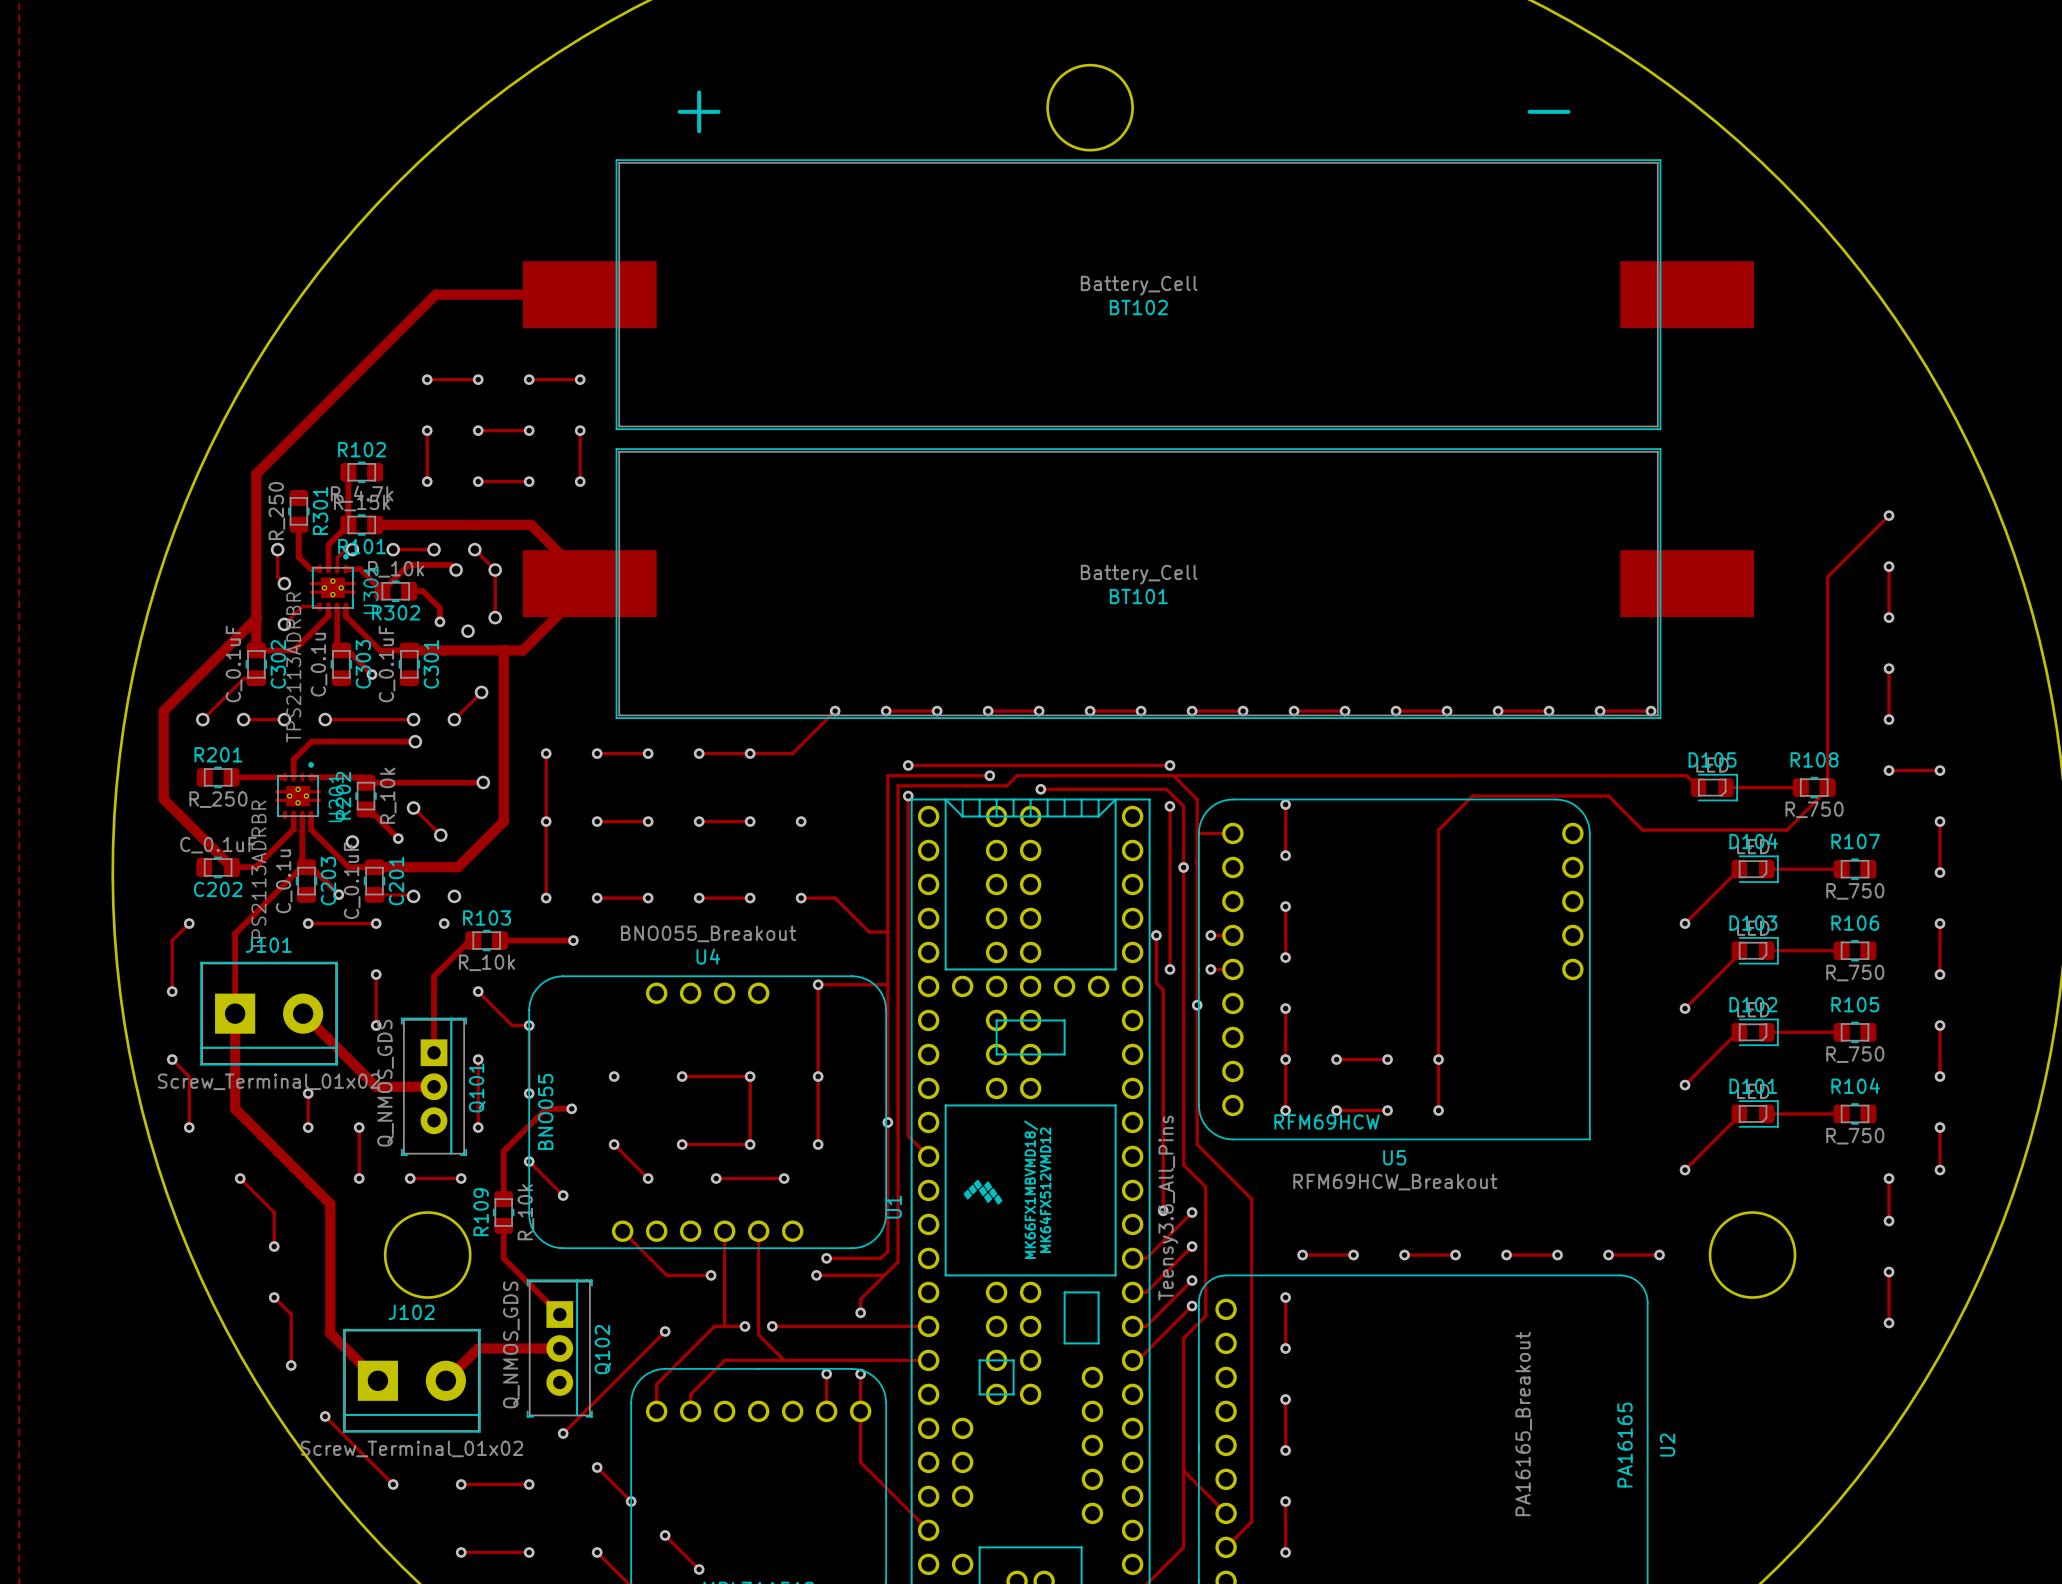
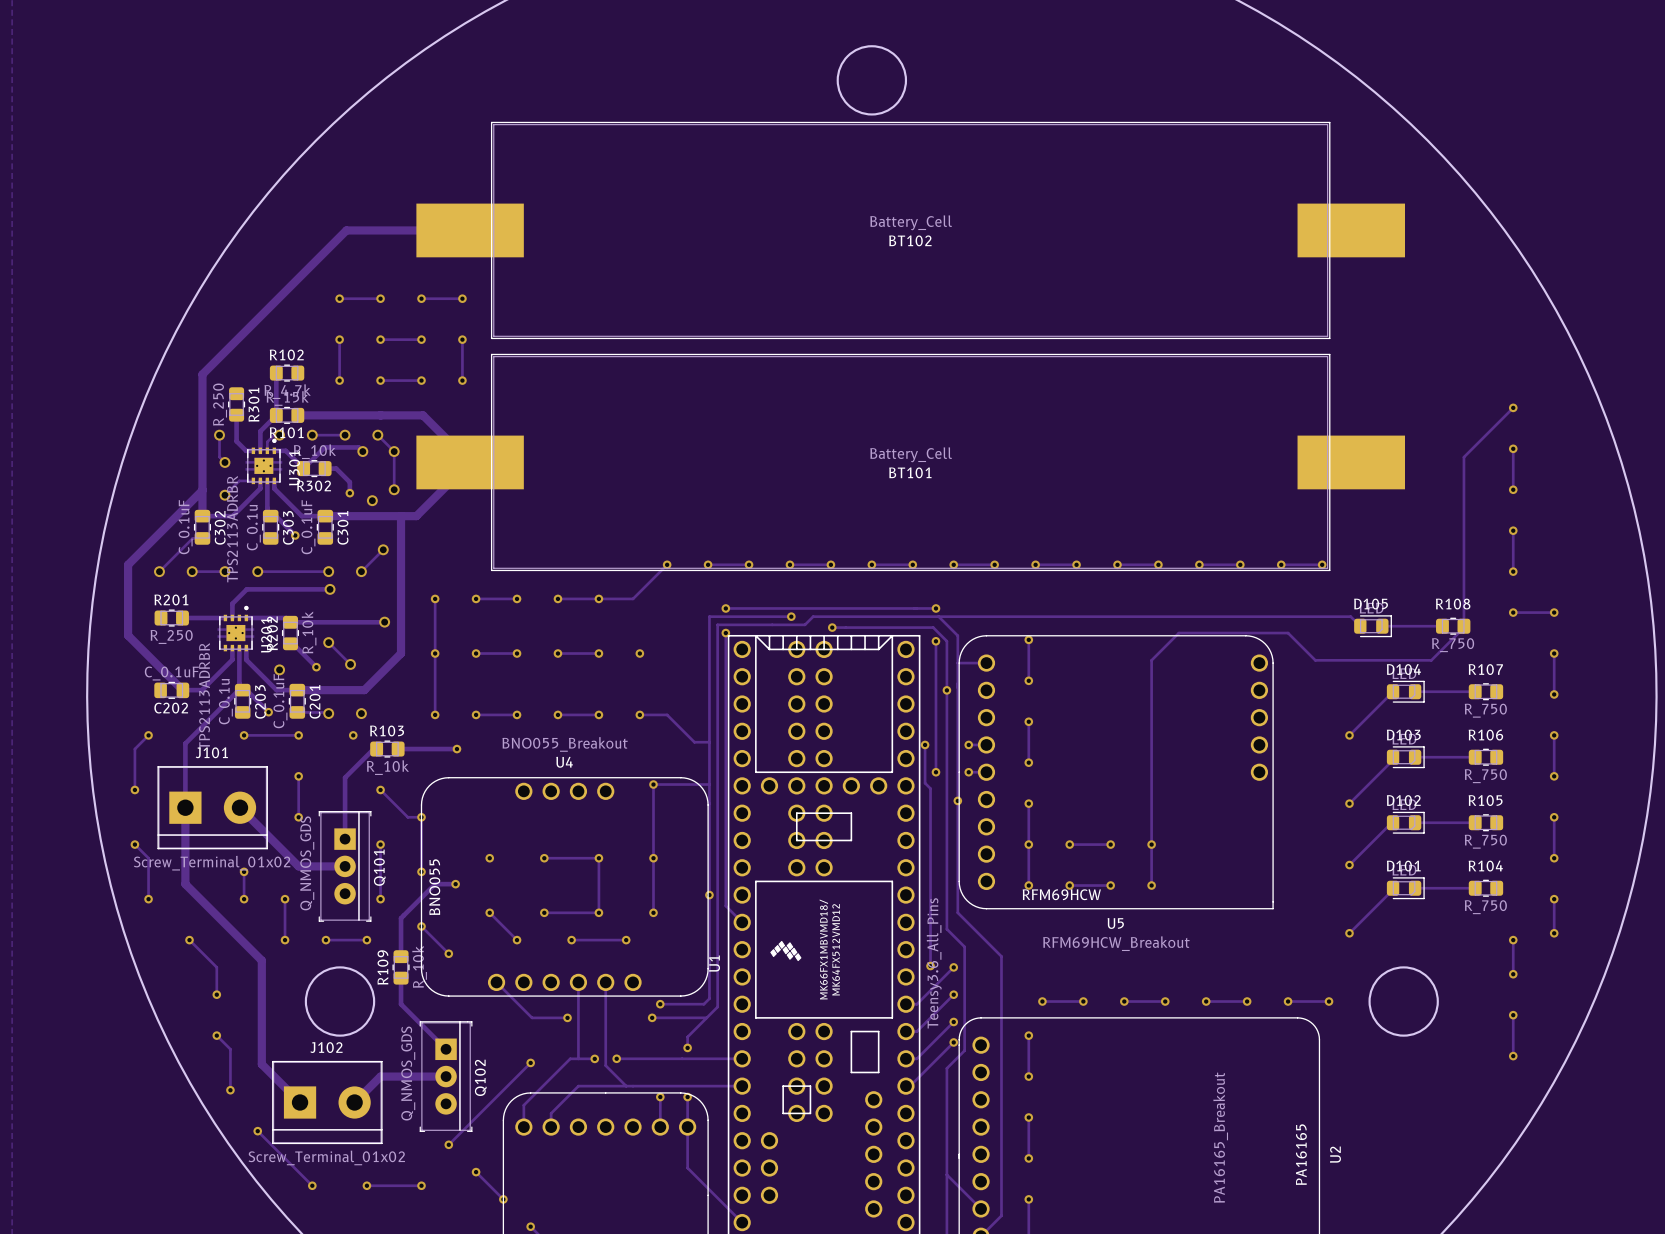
text: + (699, 111) -> none
text: - (1549, 111) -> none

